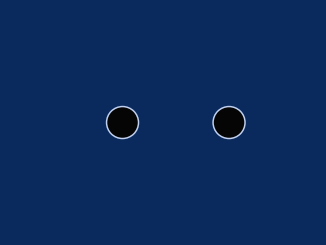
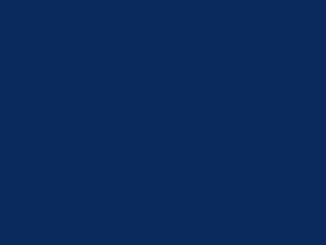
part: (175, 122) -> none

